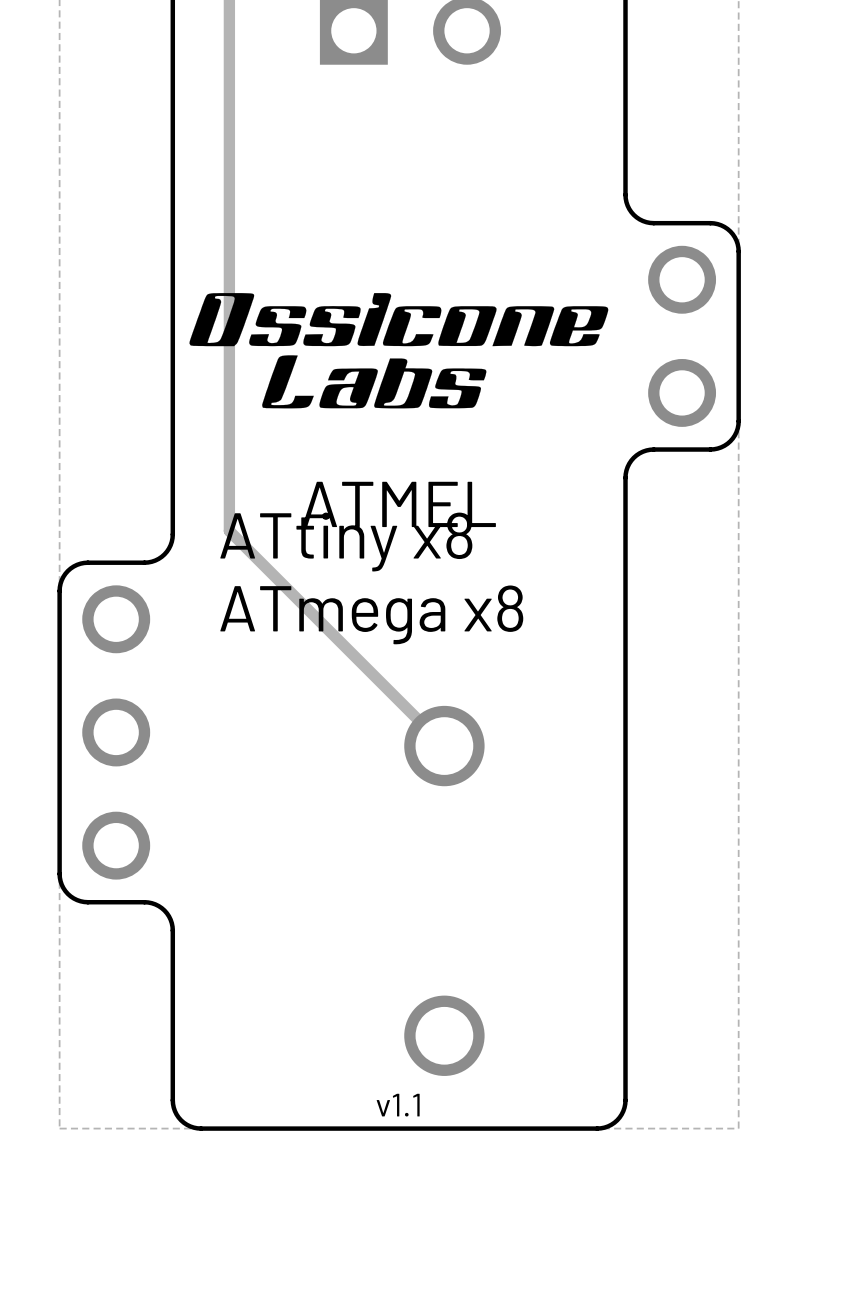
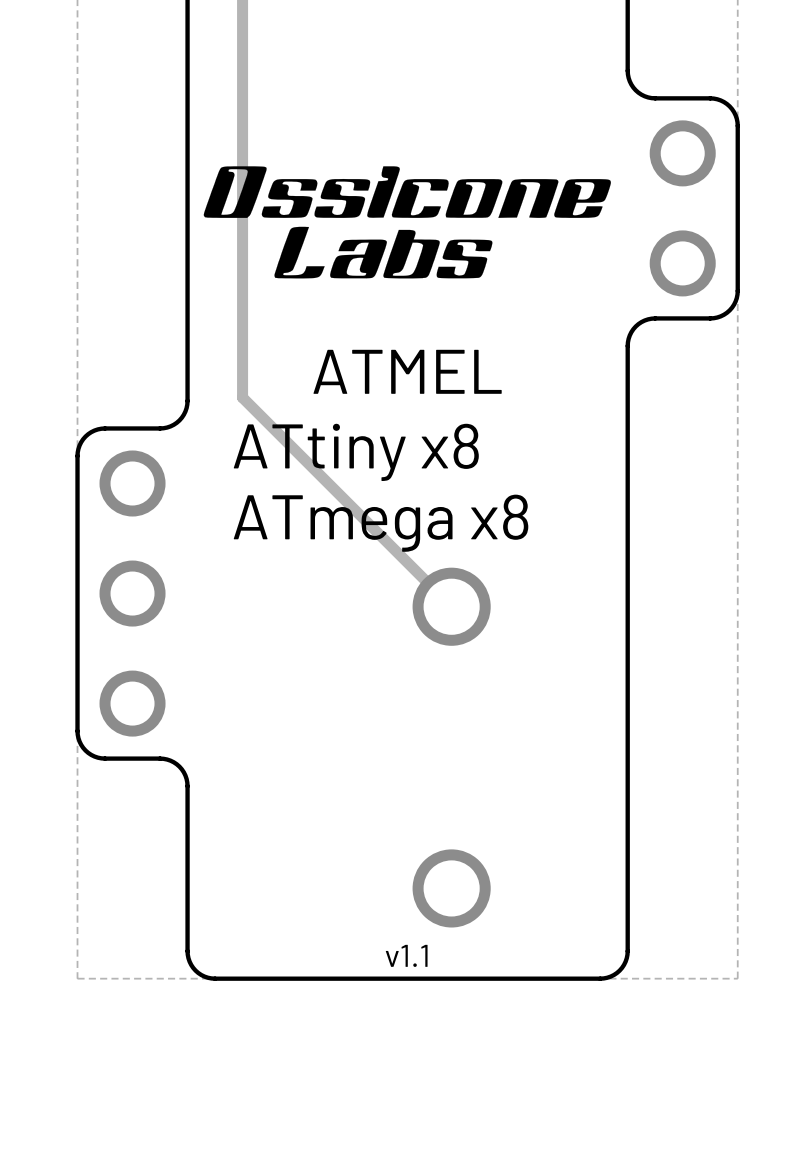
text position: ATtiny x8 (346, 542) -> ATtiny x8 (356, 452)
text position: ATmega x8 (371, 614) -> ATmega x8 (380, 523)

